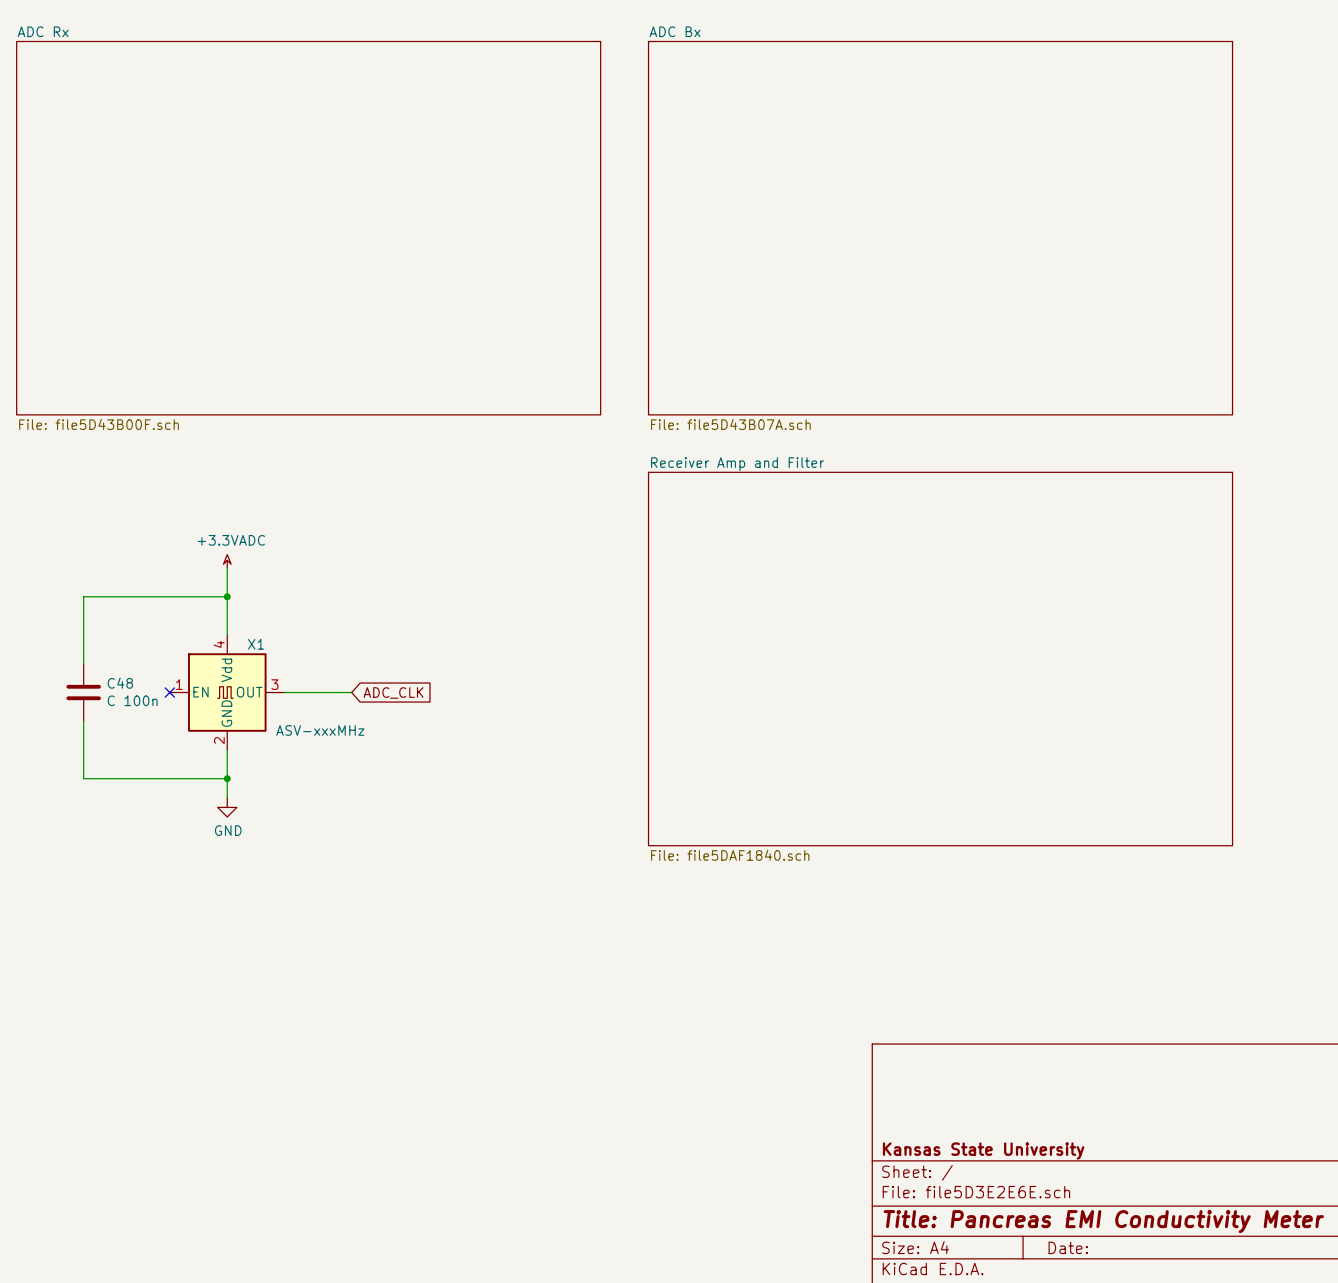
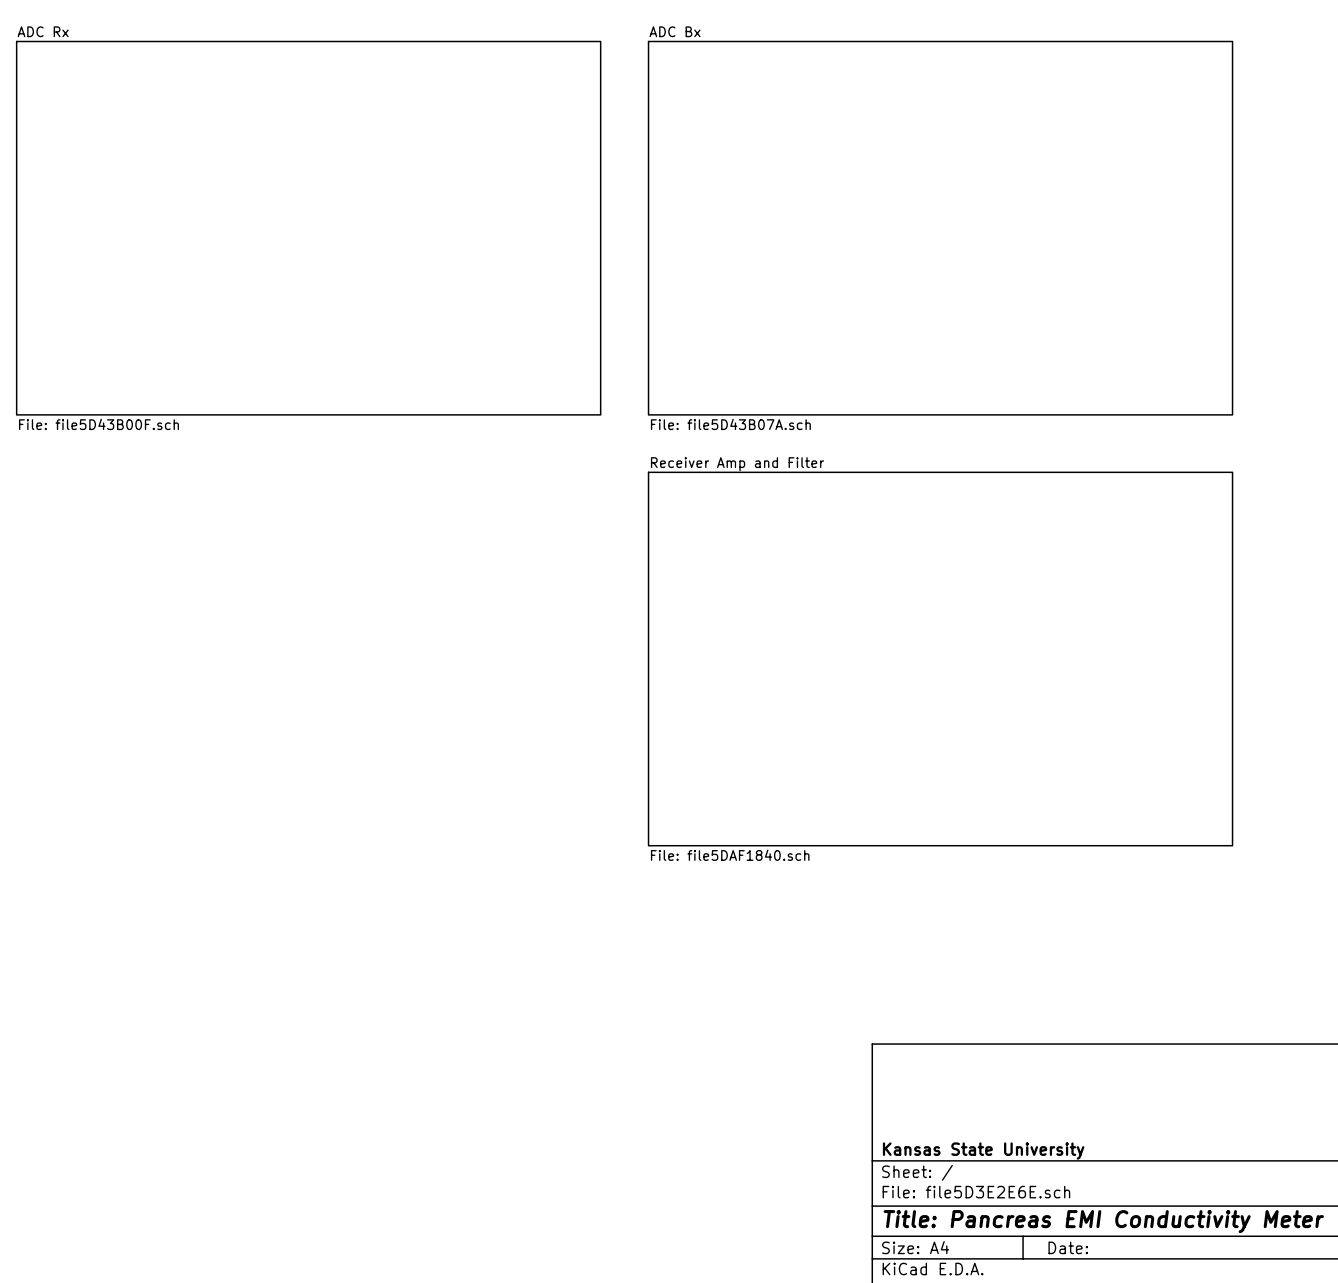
power symbol: +3.3VADC (227, 561) -> none
wire: (227, 568) (227, 635) -> none
wire: (227, 596) (83, 596) (83, 663) -> none
junction: (227, 596) -> none
C48: C 100n (83, 692) -> none
no-connect mark: (169, 692) -> none
X1: ASV-xxxMHz (227, 692) -> none
wire: (284, 692) (351, 692) -> none
global label: ADC_CLK (393, 692) -> none
wire: (83, 721) (83, 778) (227, 778) -> none
wire: (227, 749) (227, 797) -> none
junction: (227, 778) -> none
power symbol: GND (227, 807) -> none

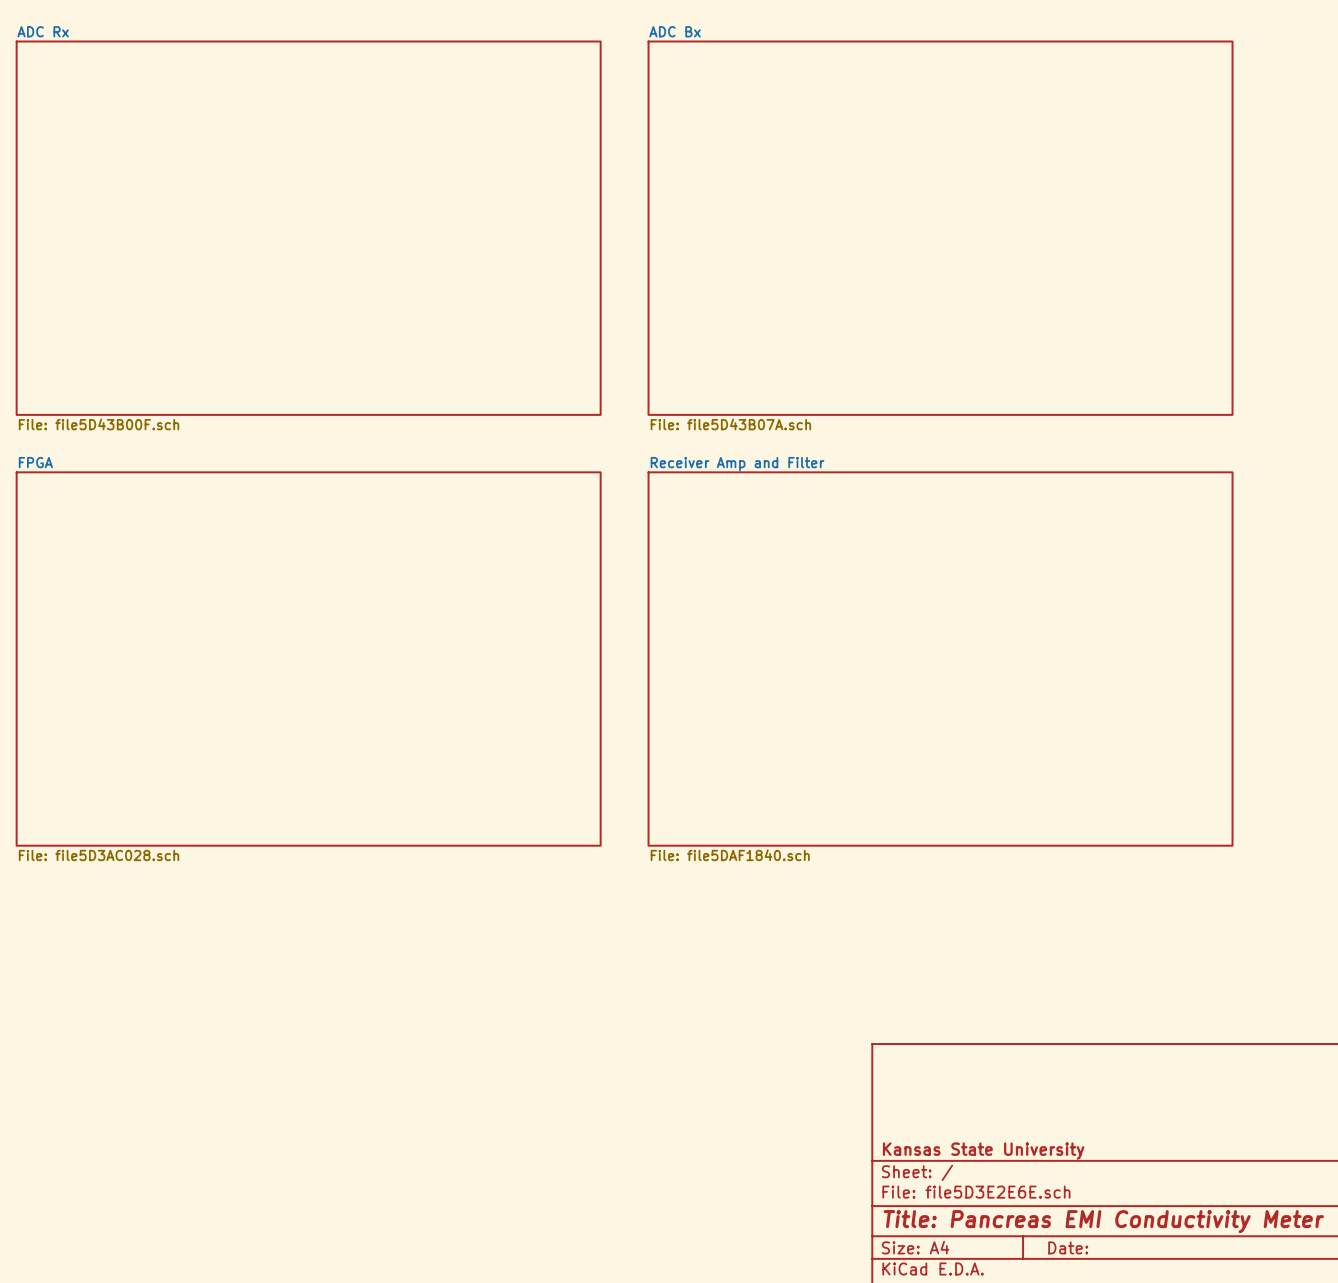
sheet FPGA: none -> File: file5D3AC028.sch (308, 659)

